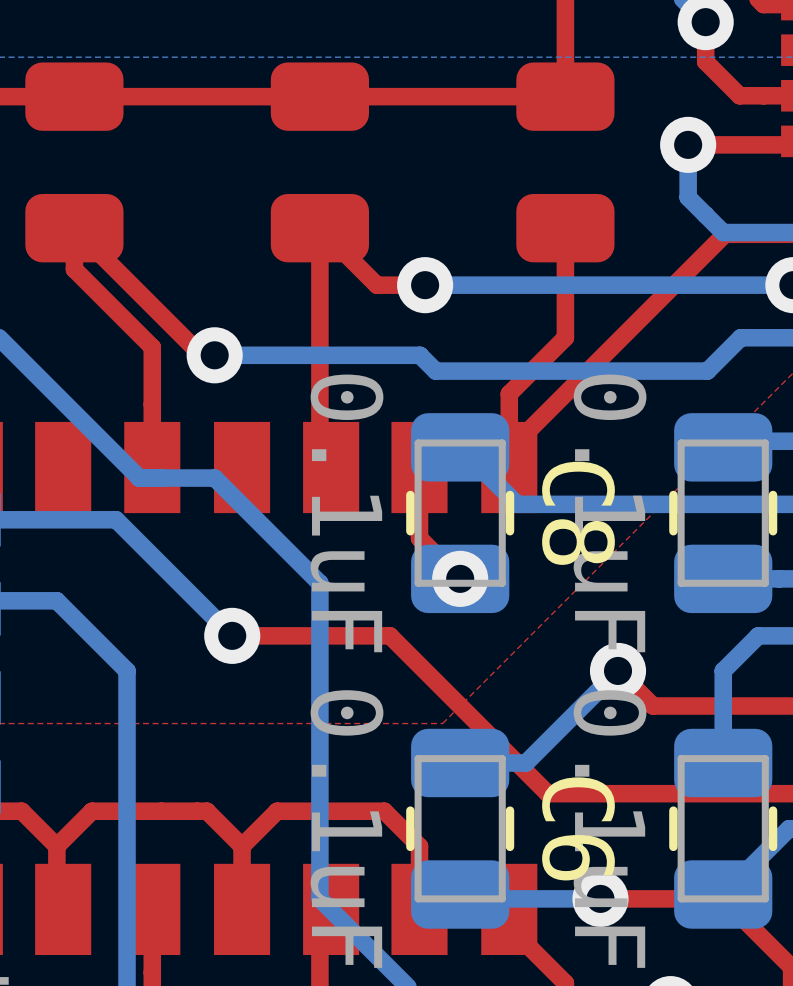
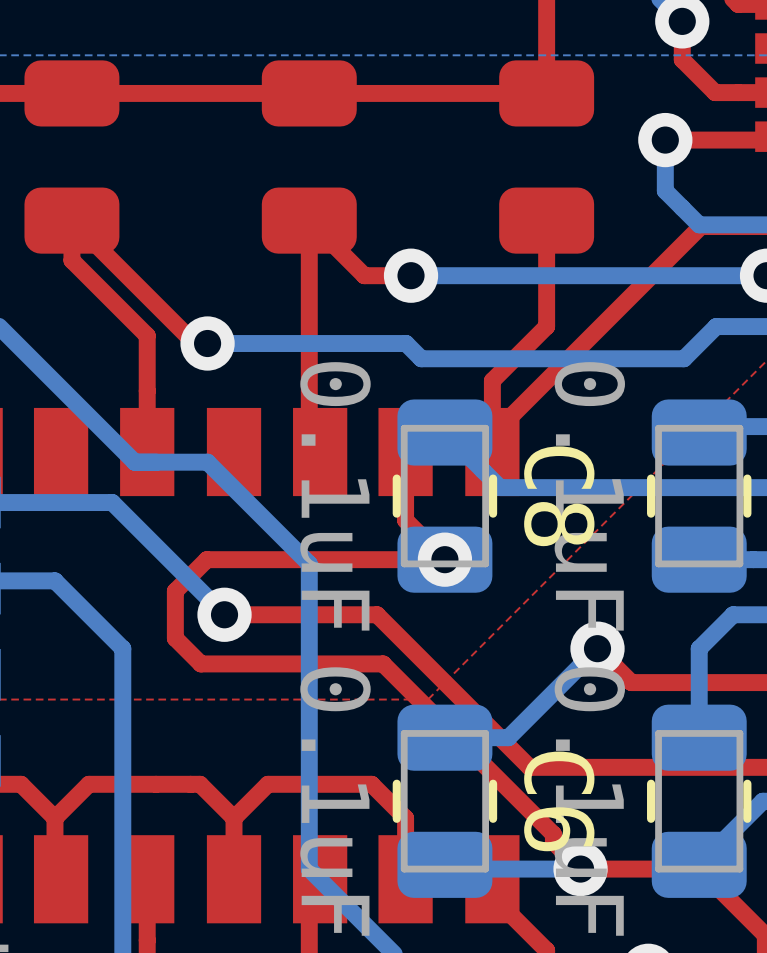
top track: none -> (444, 559) (206, 559) (175, 591) (175, 638) (200, 663) (383, 663) (553, 834) (553, 841) (580, 869)

